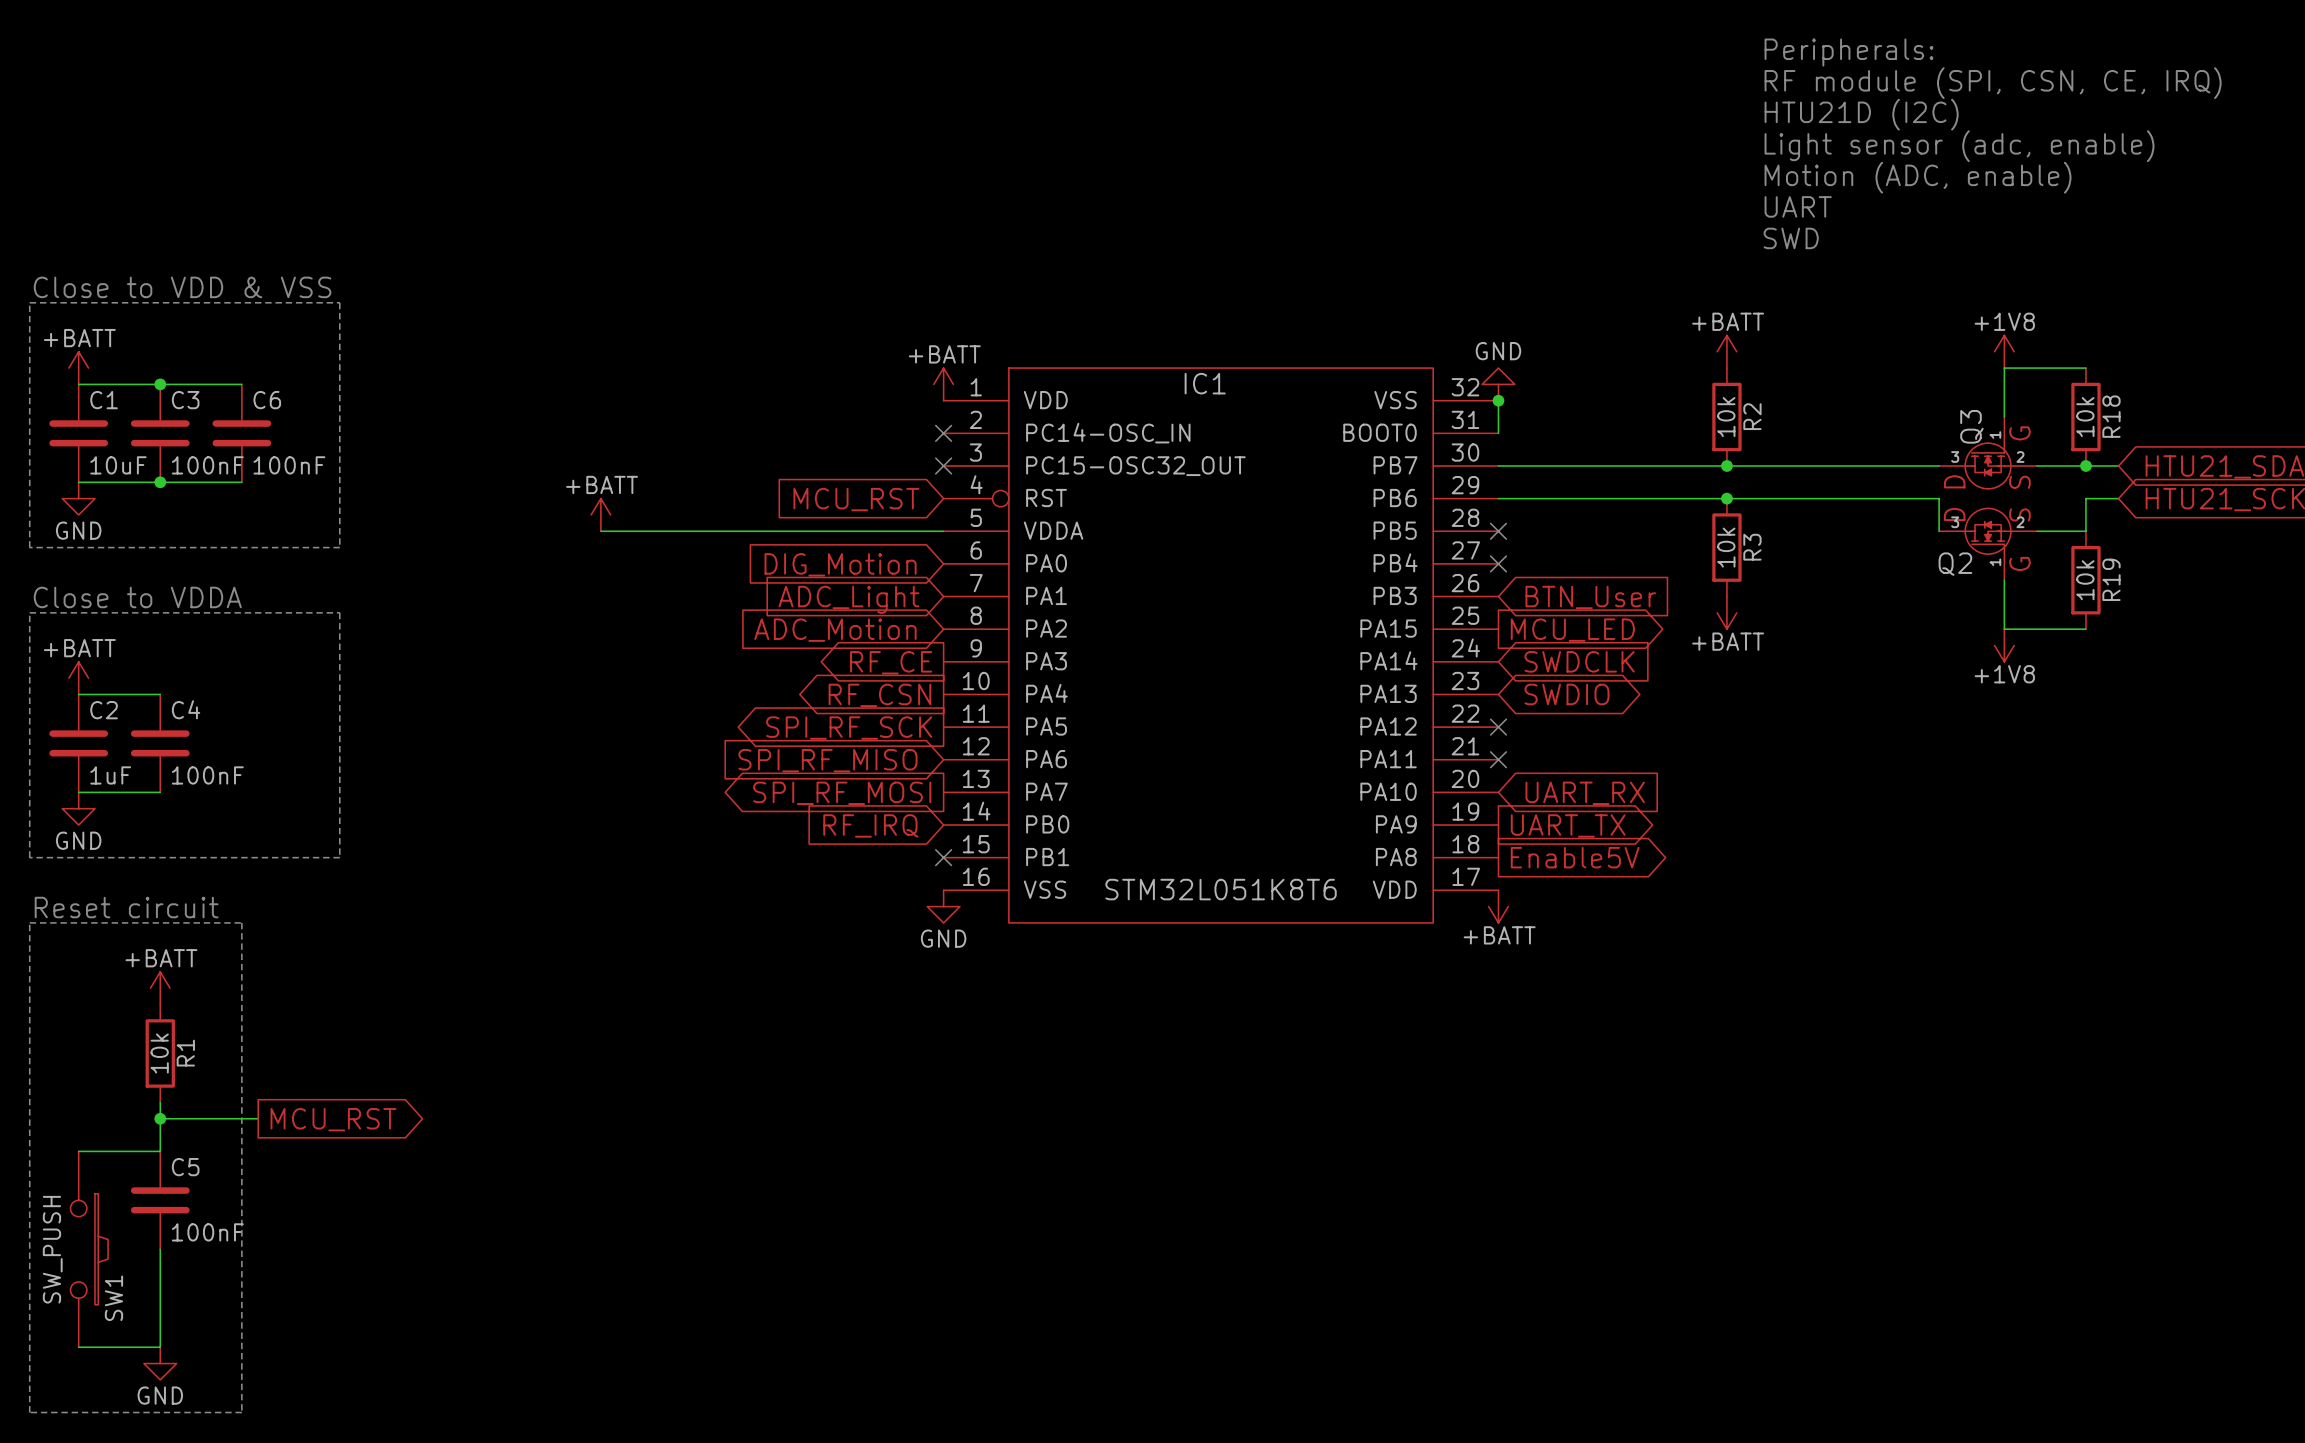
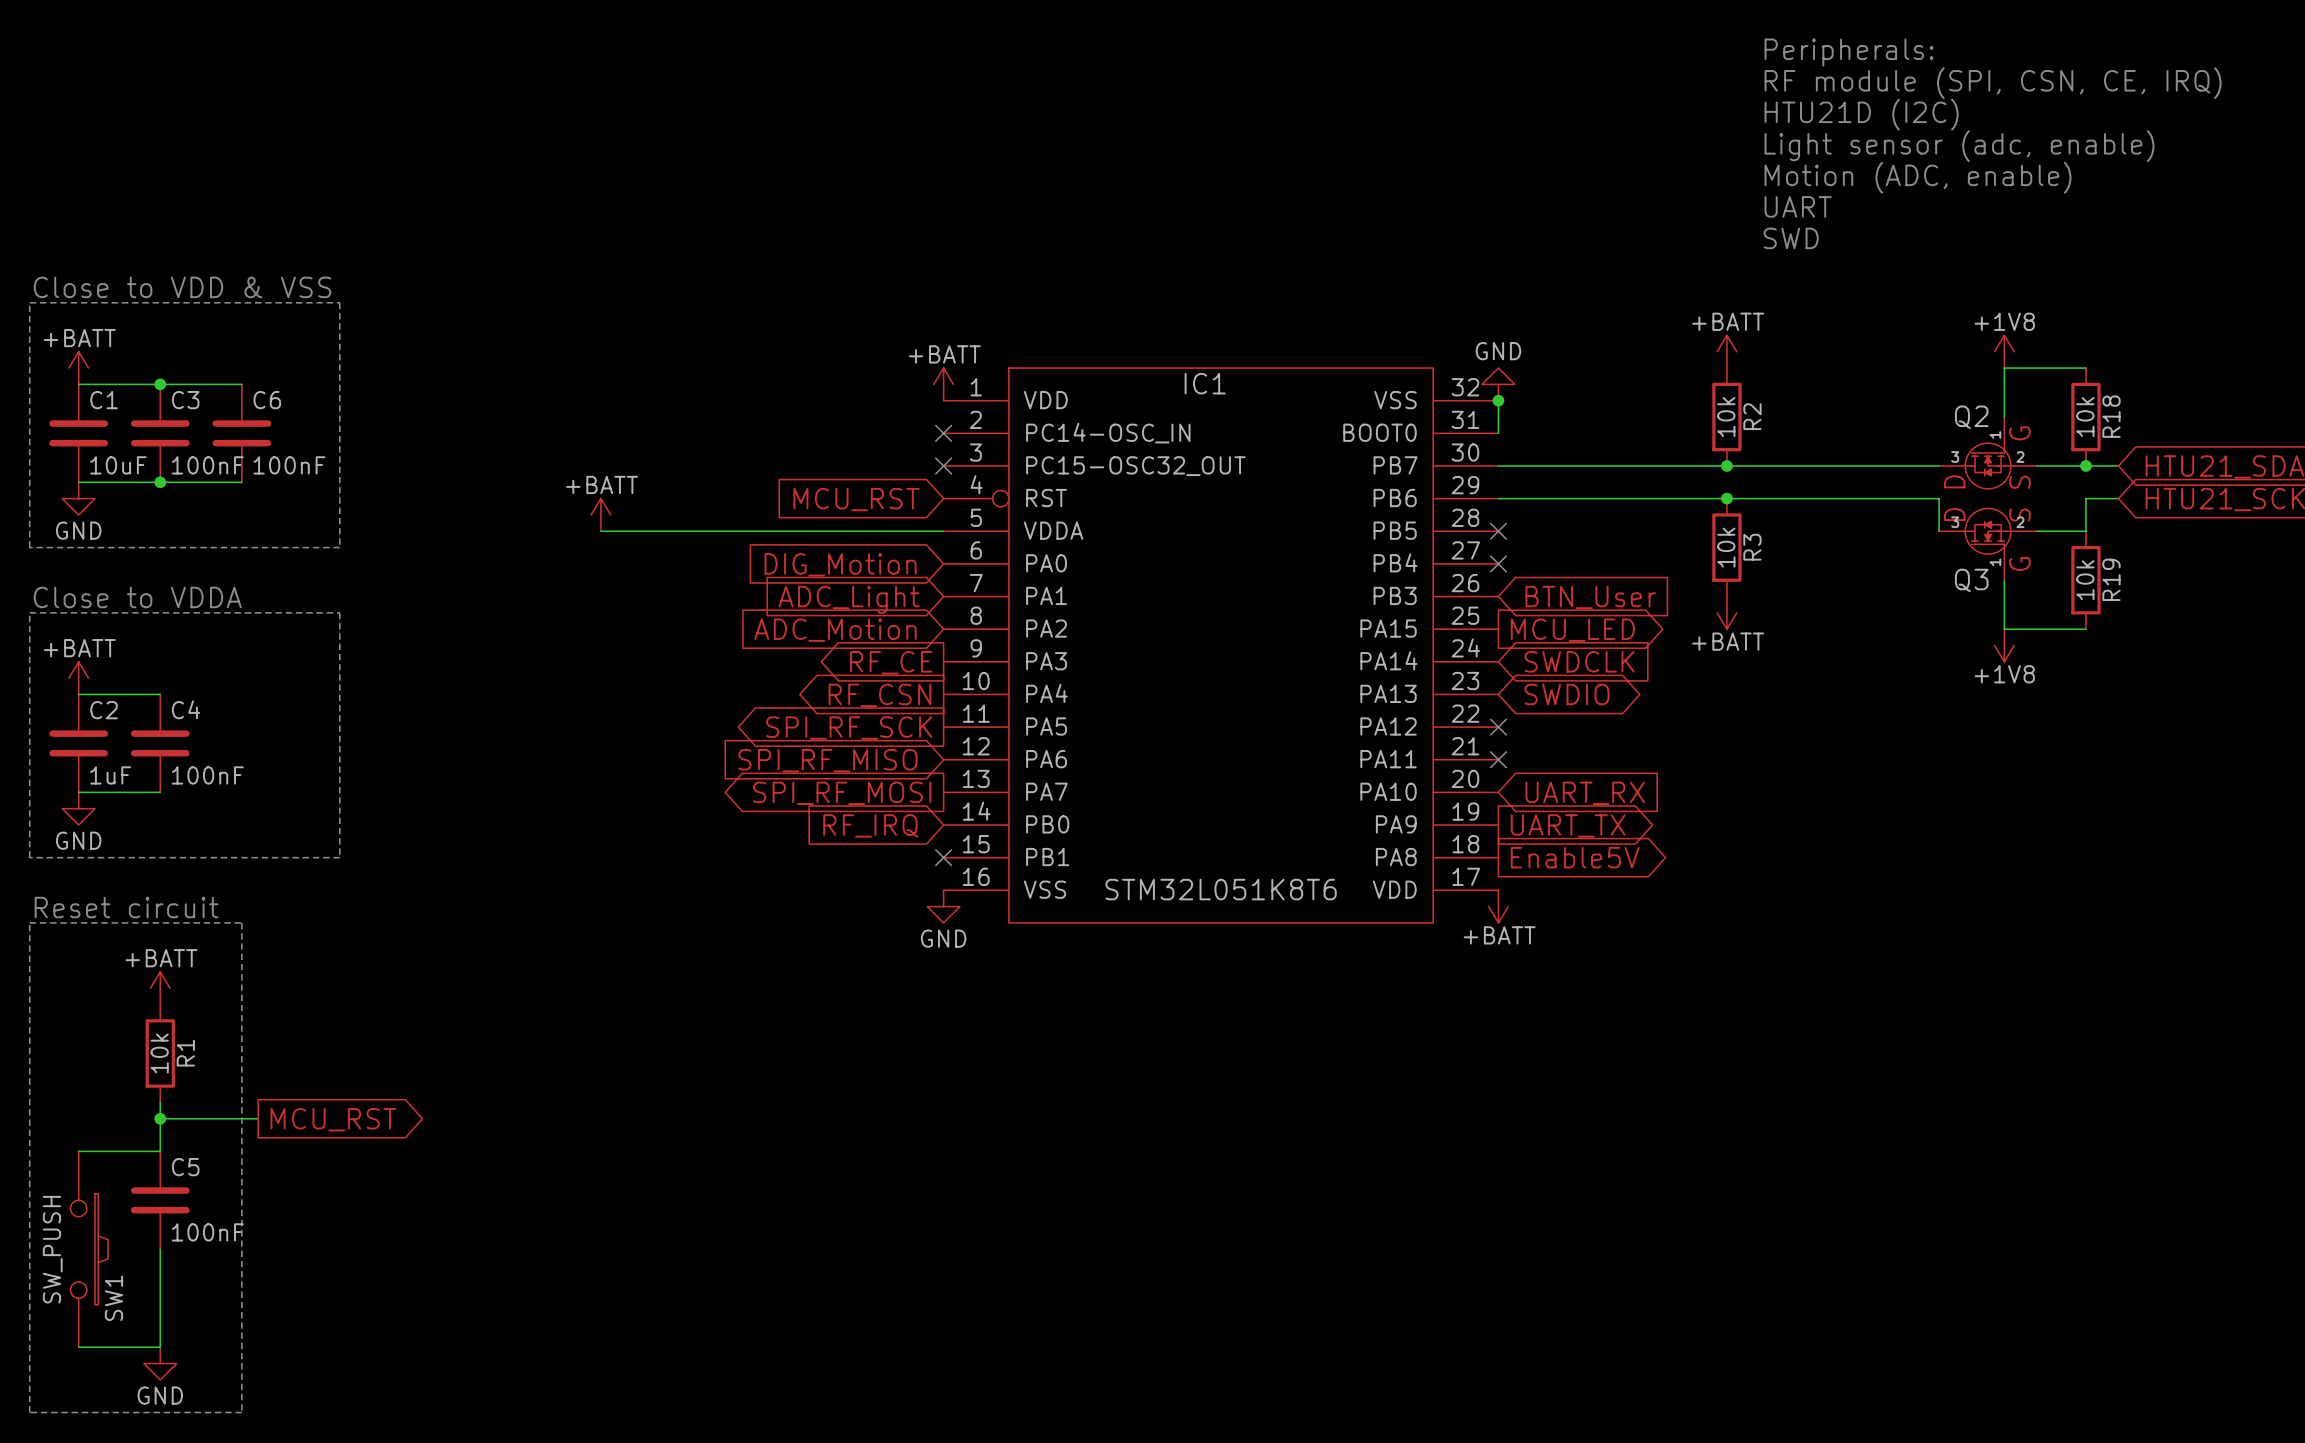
Q3 name rotation: 0° (1971, 426) -> 90° clockwise (1971, 580)
Q3 name position: Q3 (1971, 426) -> Q3 (1971, 580)
Q2 name position: Q2 (1955, 564) -> Q2 (1971, 417)

